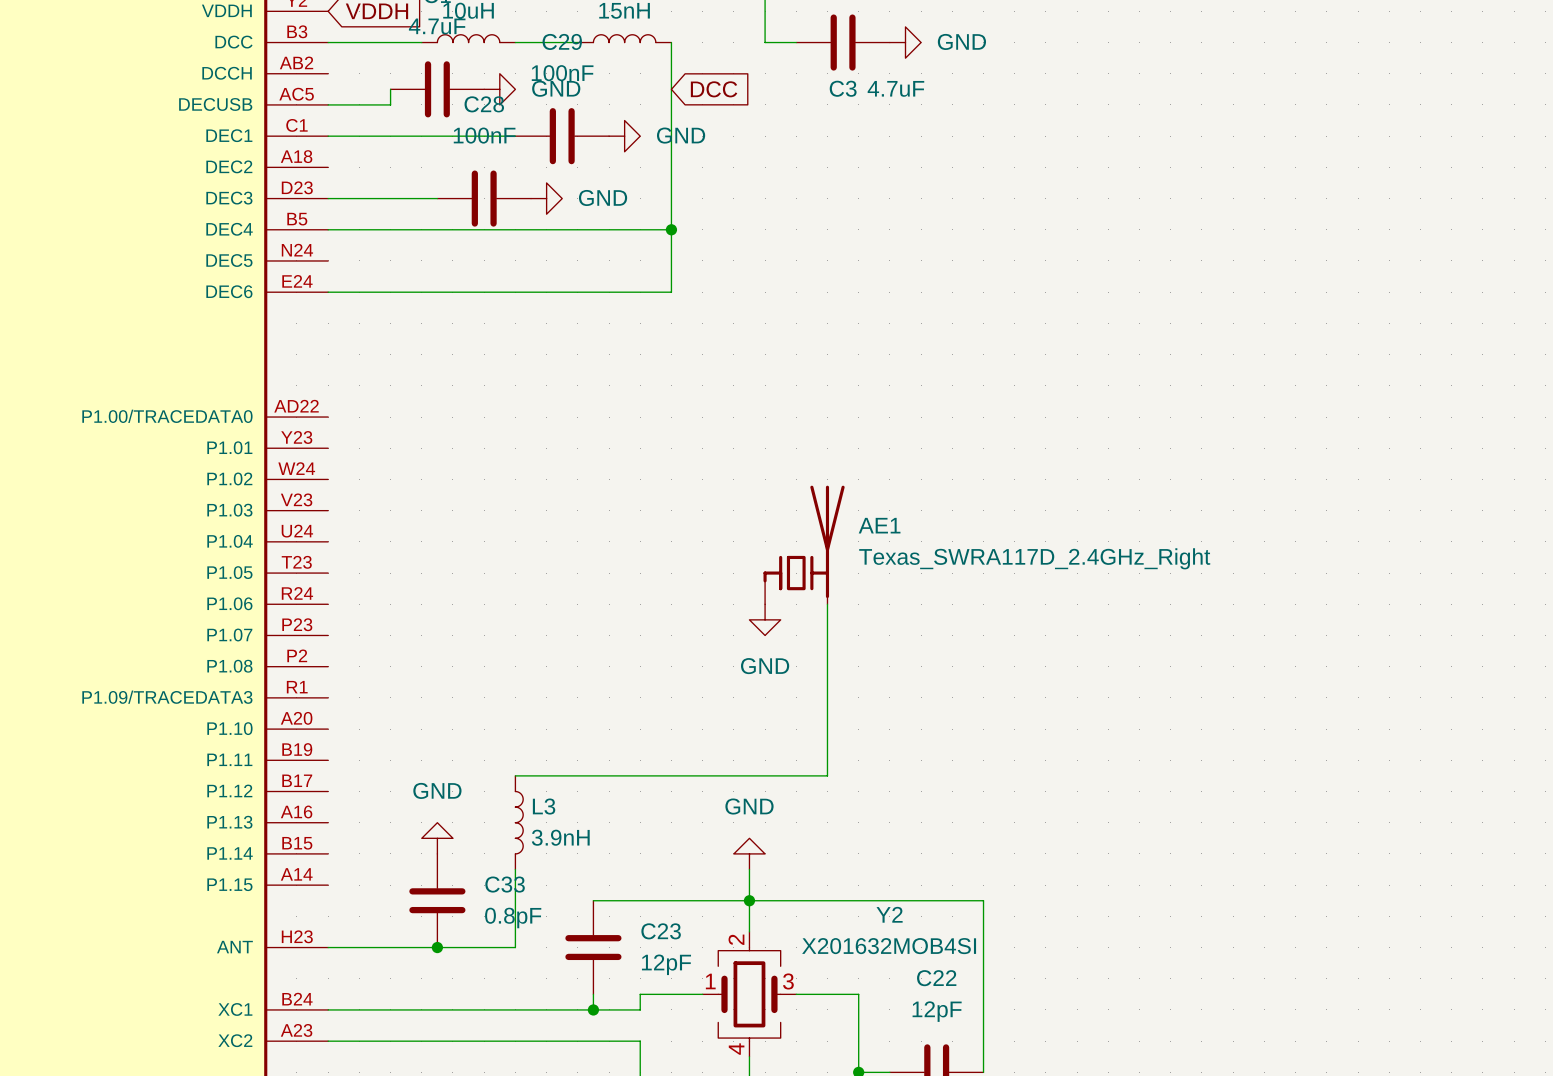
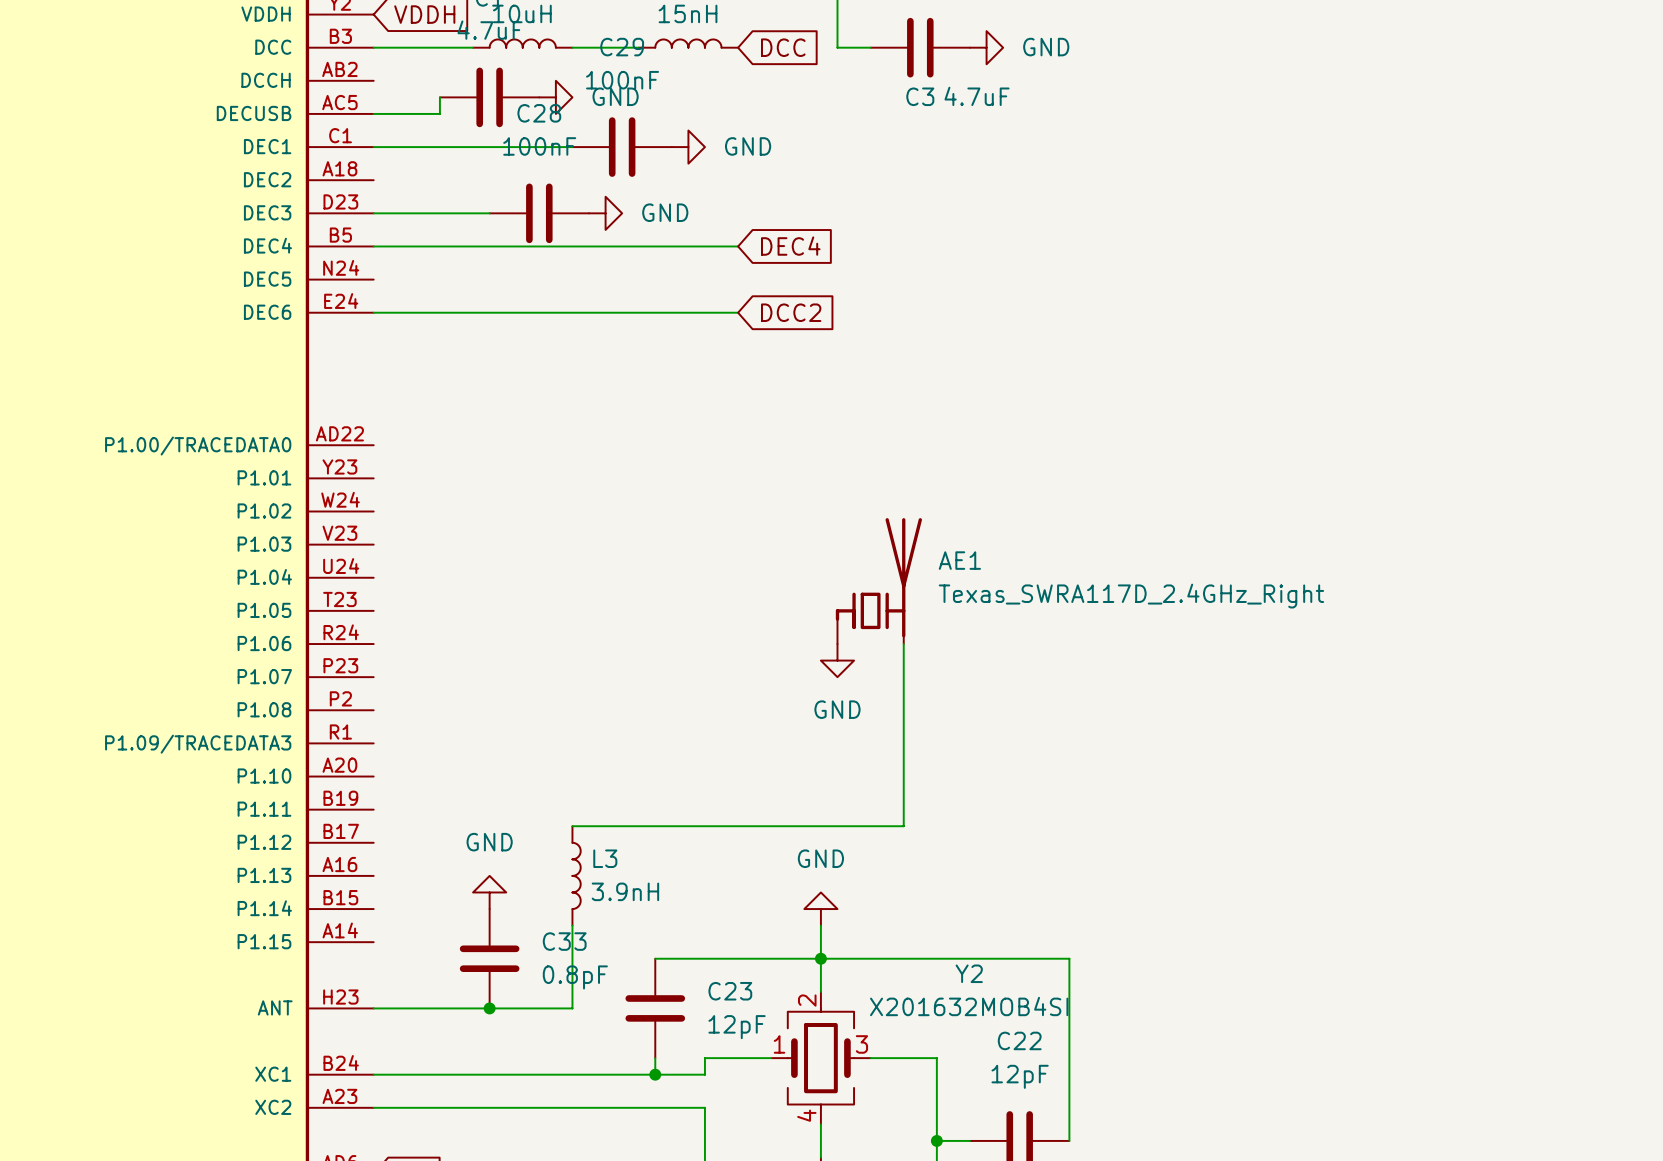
wire: (671, 42) (671, 292) -> none
global label position: DCC (714, 89) -> DCC (783, 47)
junction: (671, 229) -> none
global label: none -> DEC4 (790, 246)
global label: none -> DCC2 (791, 312)

